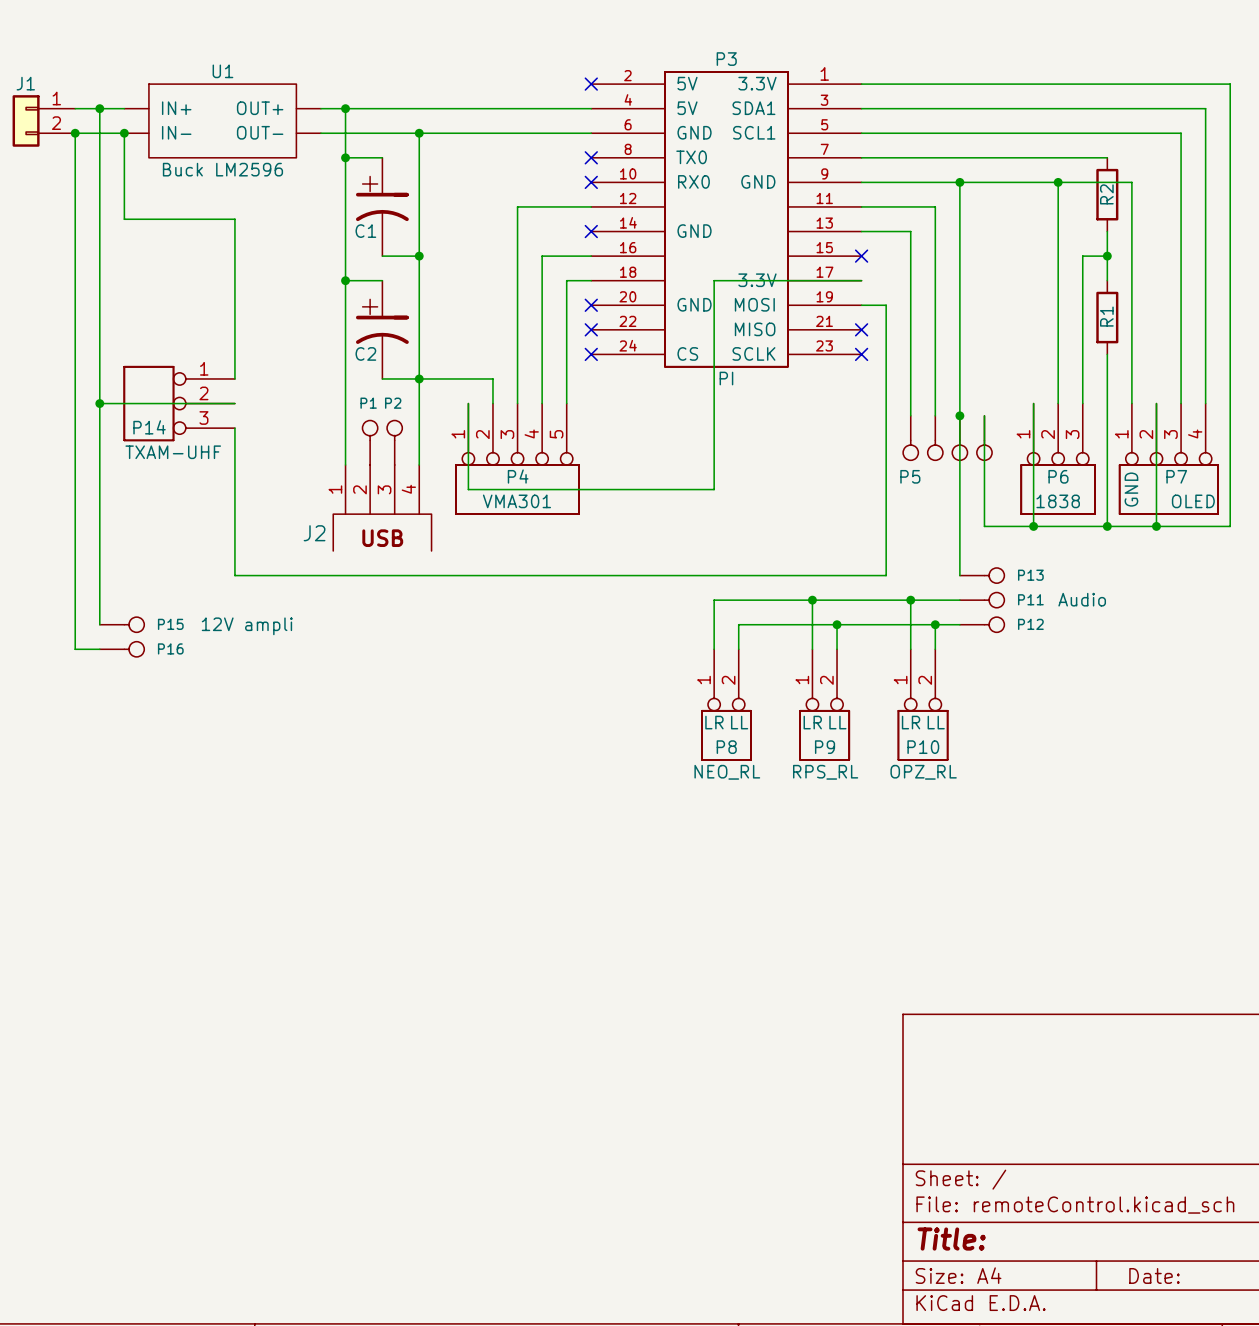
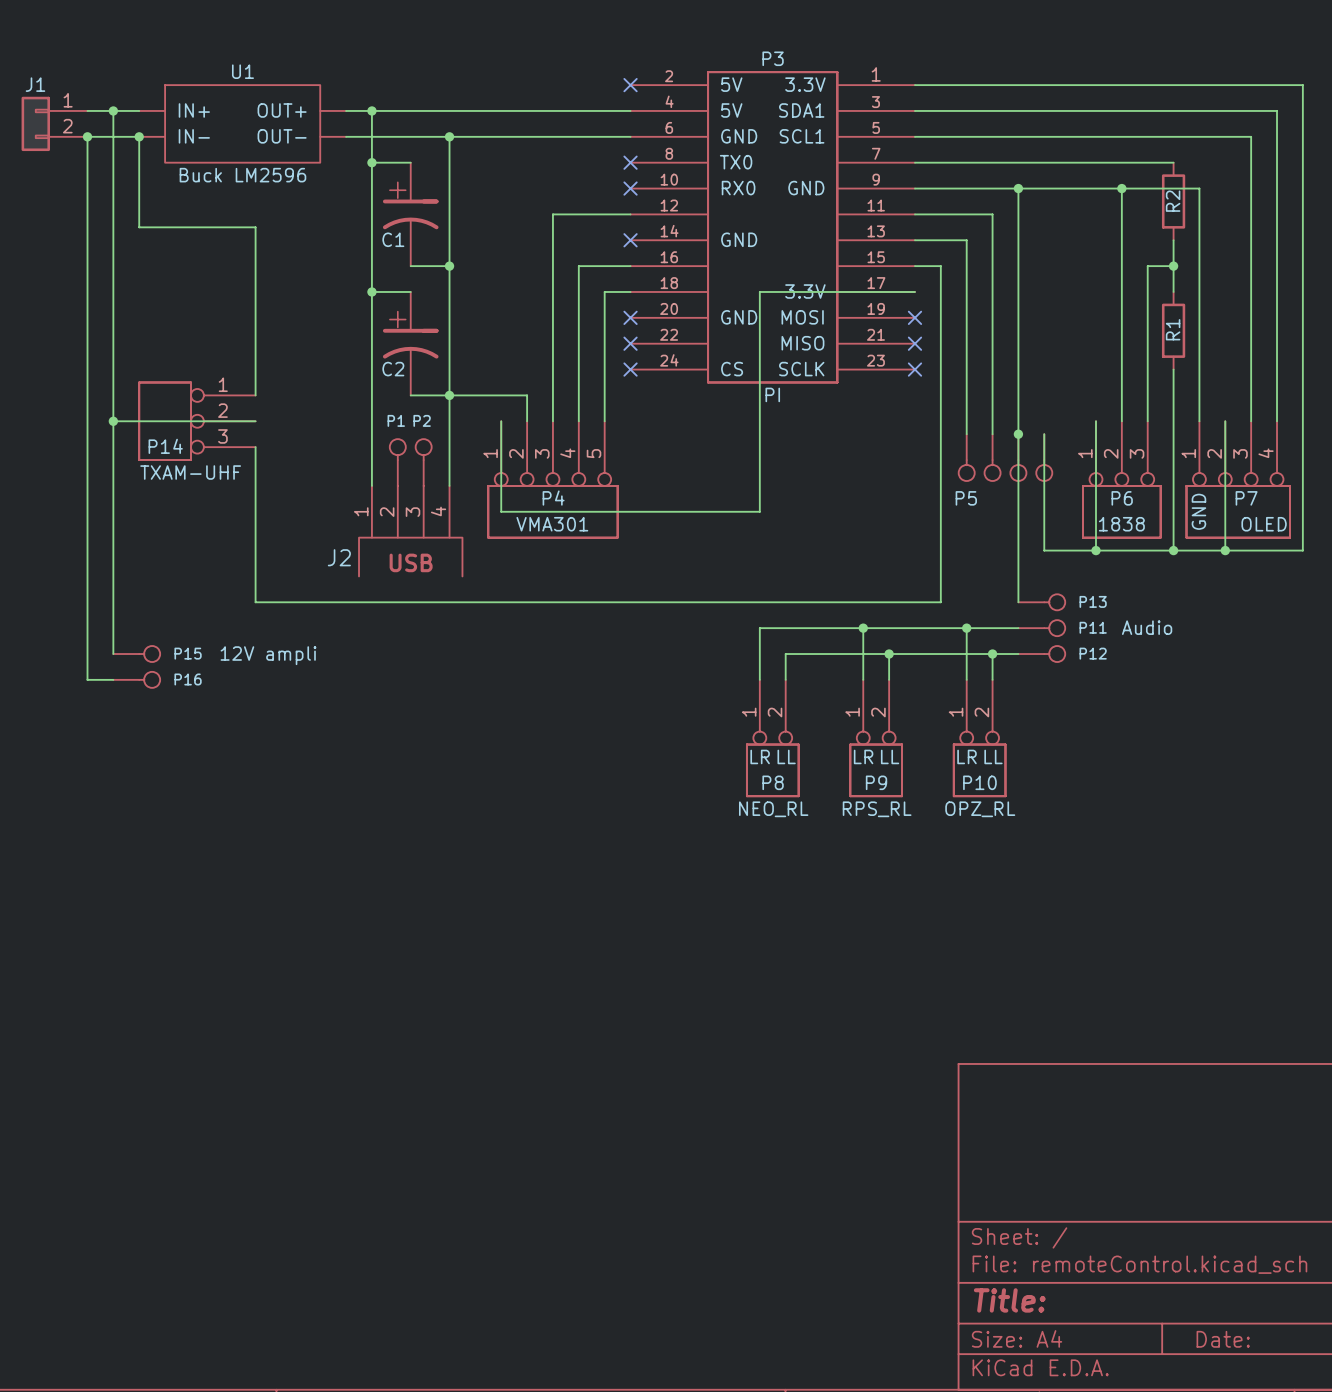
no-connect mark position: (861, 256) -> (914, 317)
wire: (861, 305) (886, 305) -> (914, 266) (940, 266) (940, 317)

